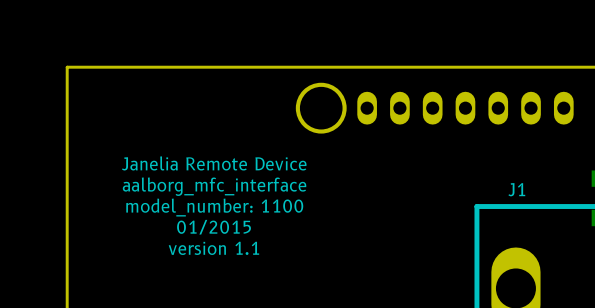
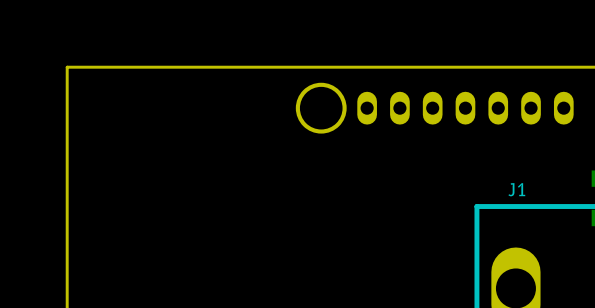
text: Janelia Remote Device (214, 163) -> none
text: aalborg_mfc_interface (214, 186) -> none
text: model_number: 1100 (214, 207) -> none
text: 01/2015 (214, 227) -> none
text: version 1.1 (213, 248) -> none

